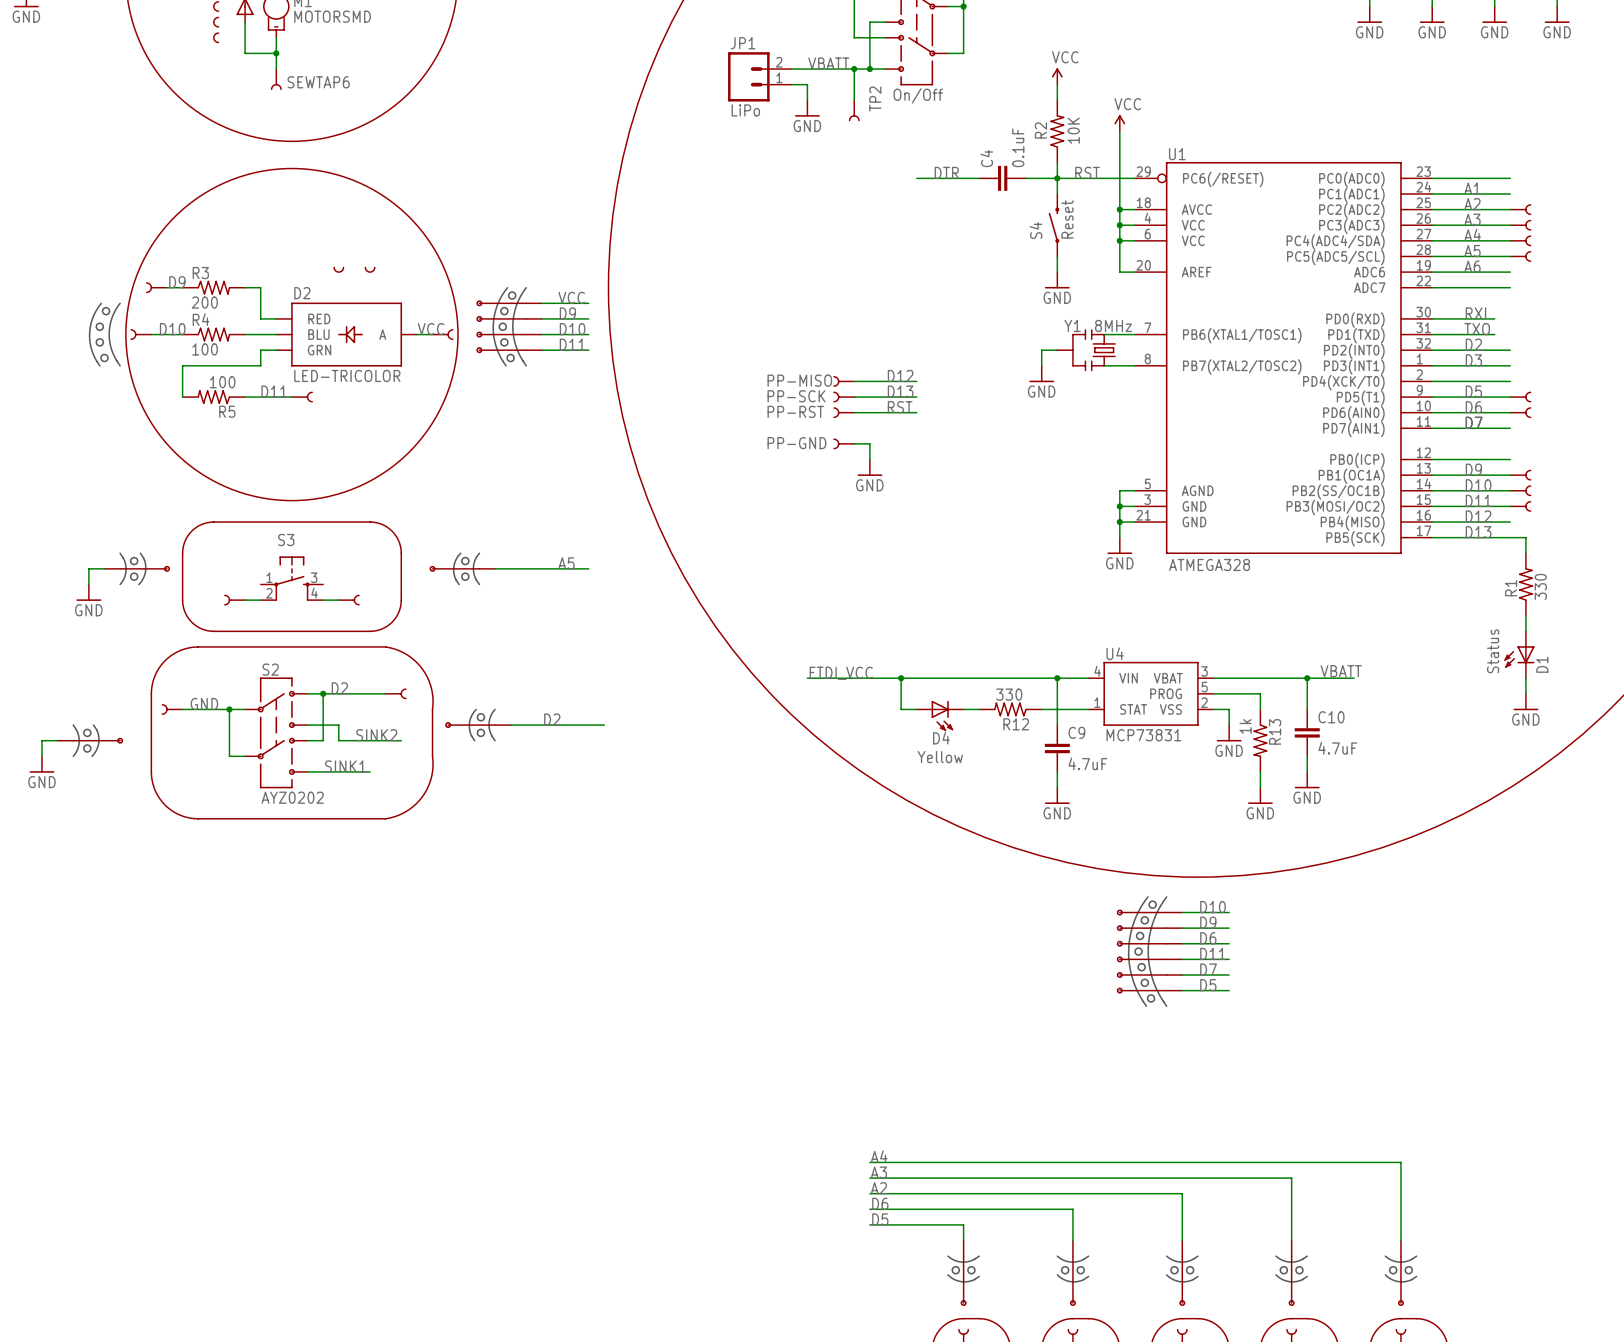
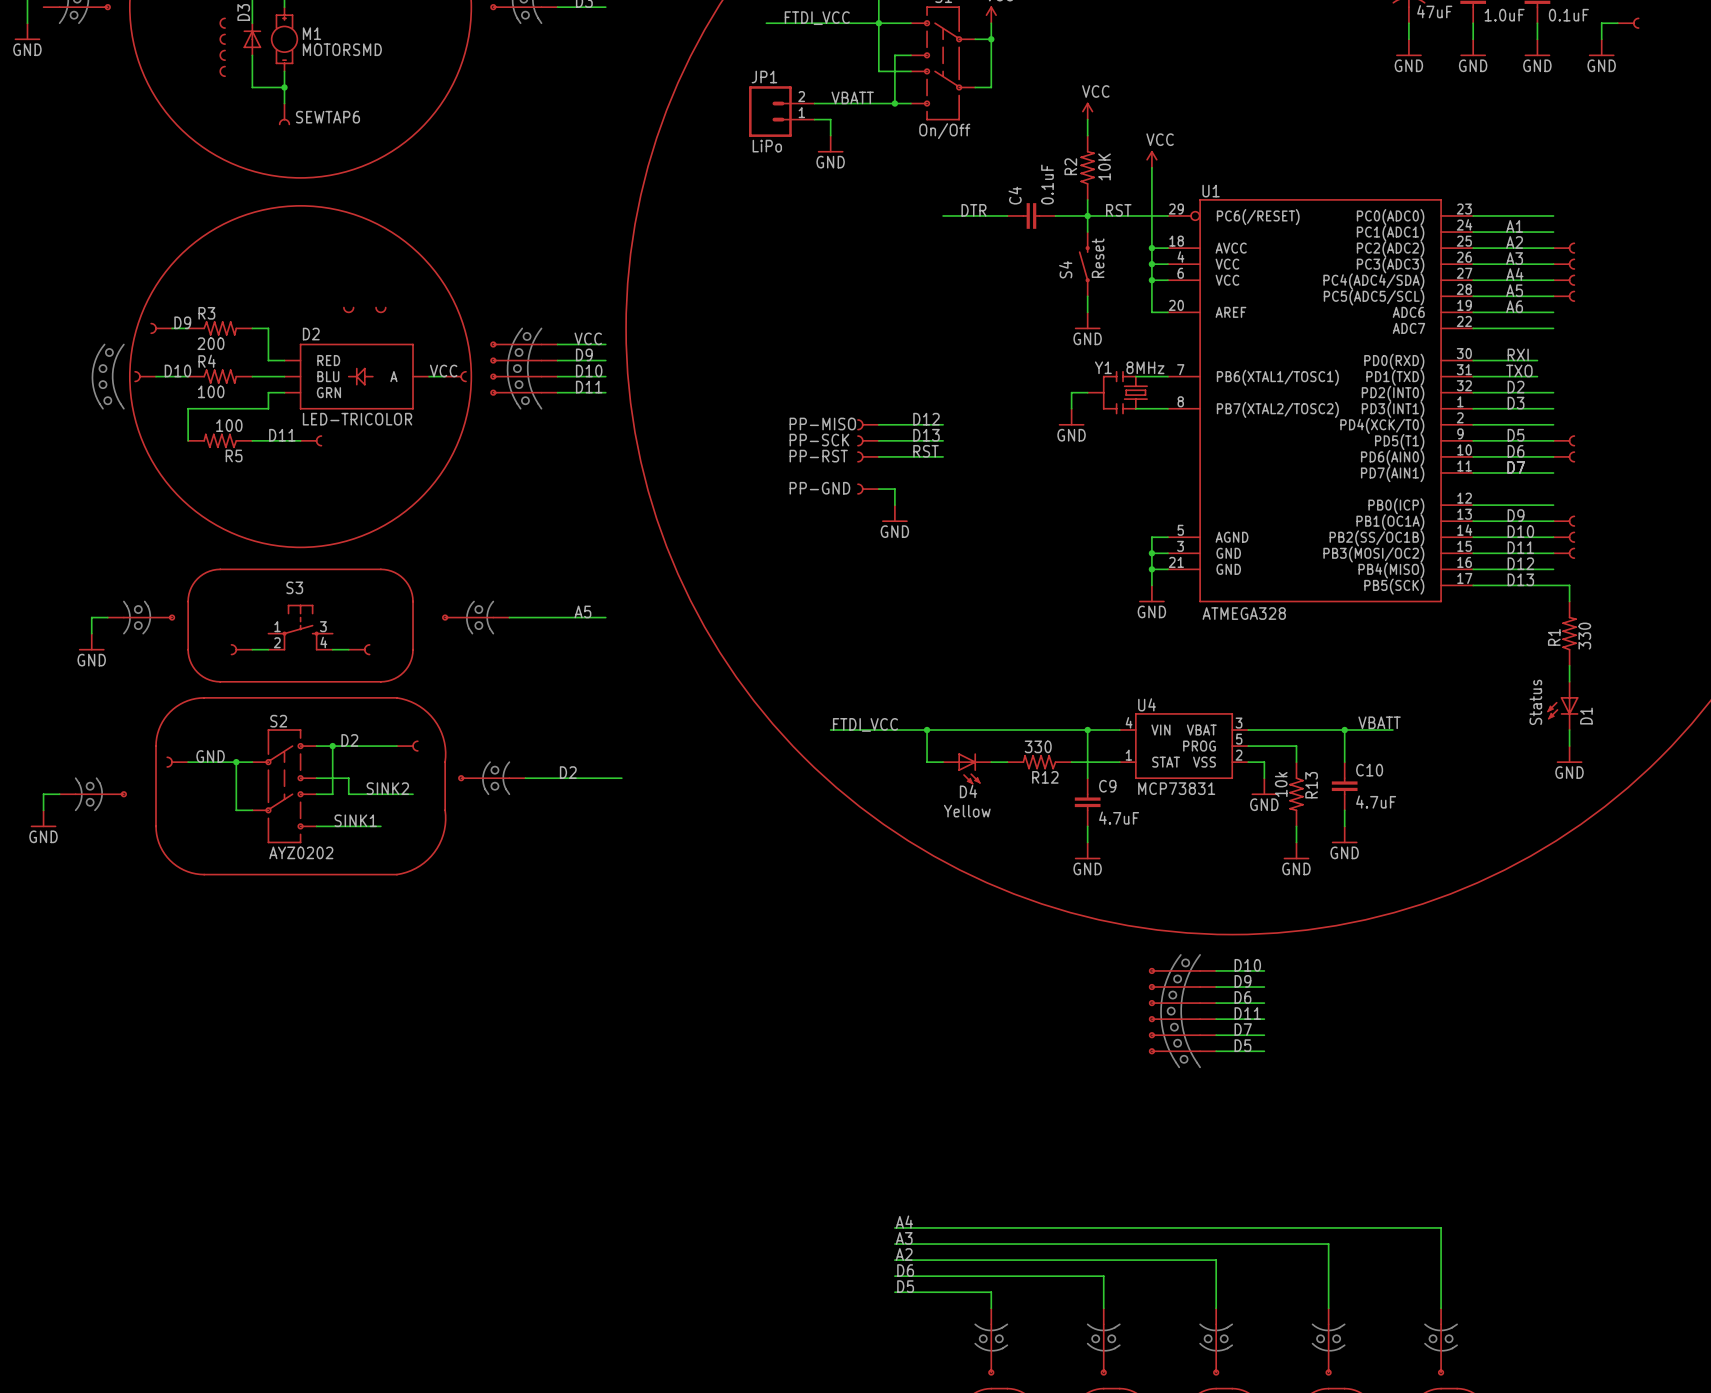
wire: (854, 69) (854, 100) -> none
junction: (854, 69) -> none
TP2: (854, 110) -> none
R13 value: 1k (1245, 726) -> 10k (1281, 784)

